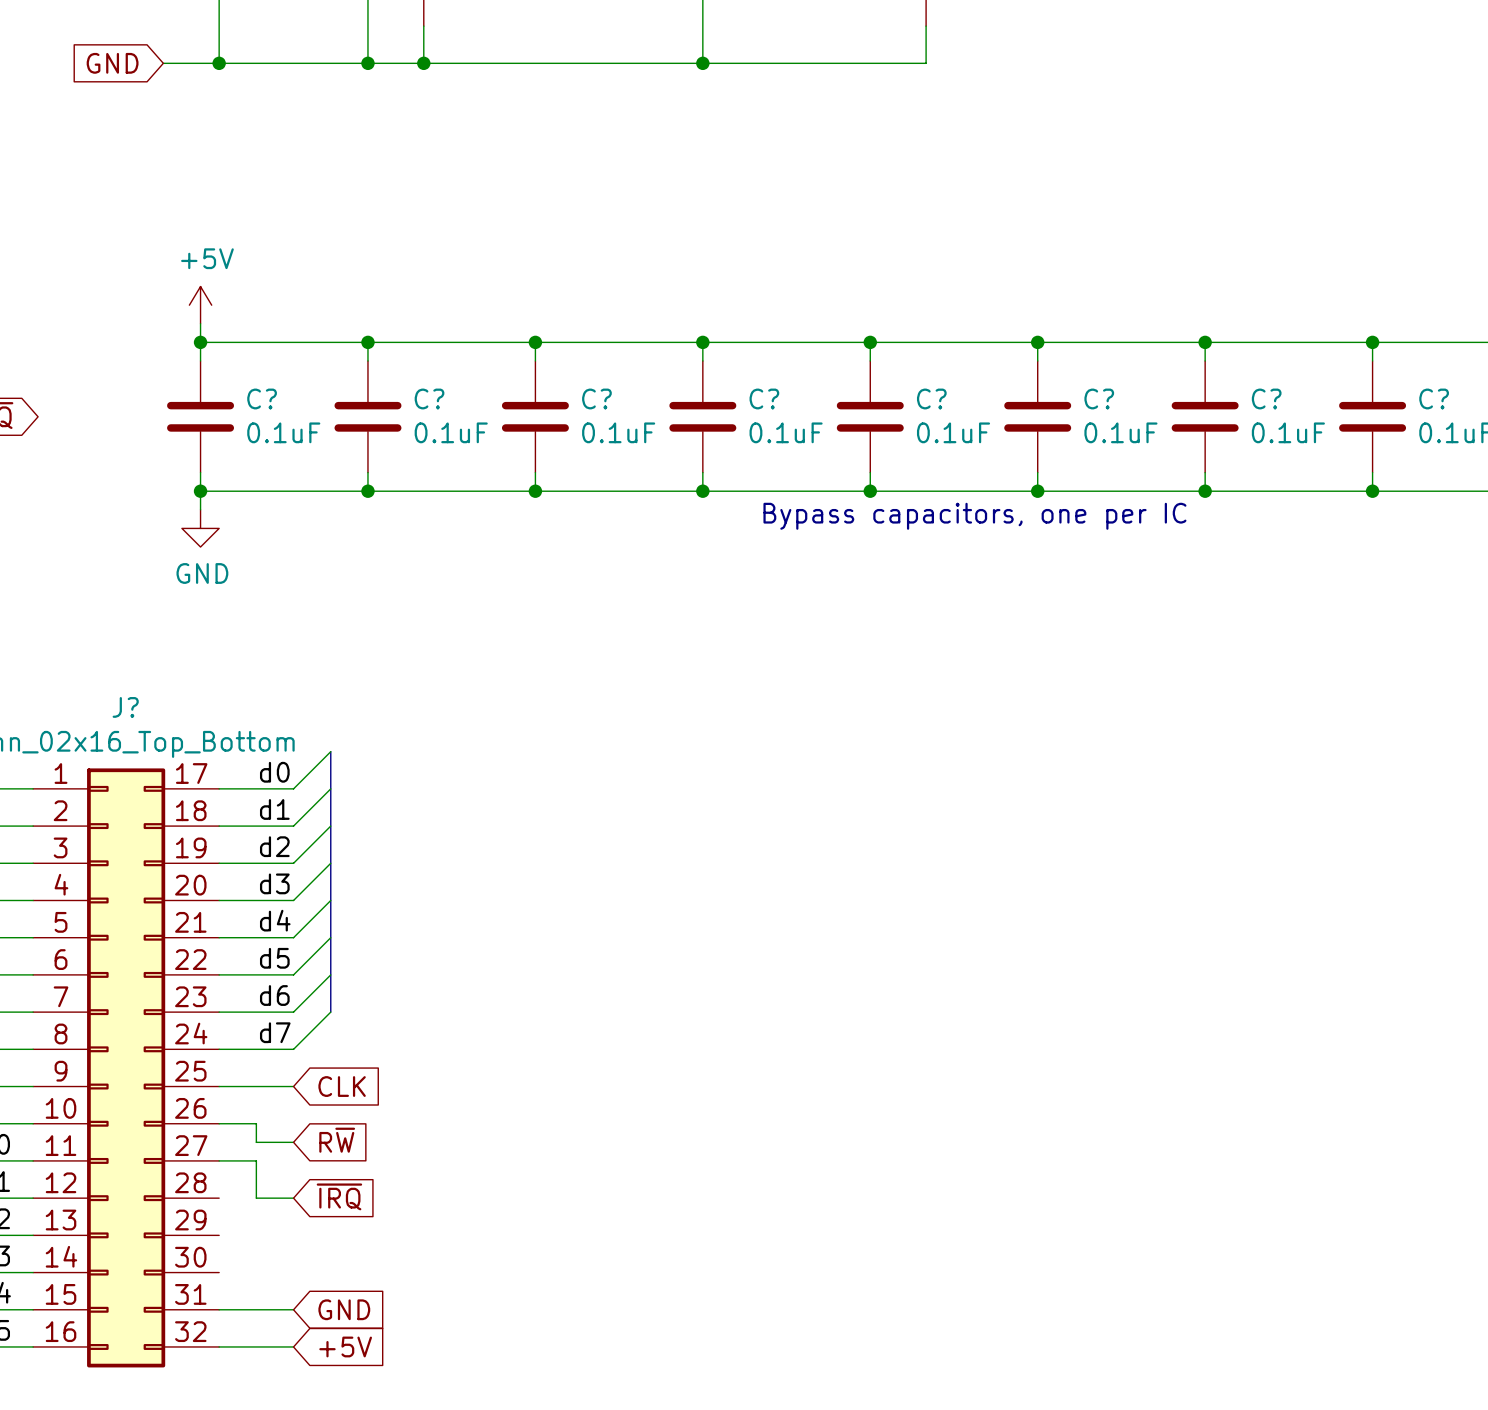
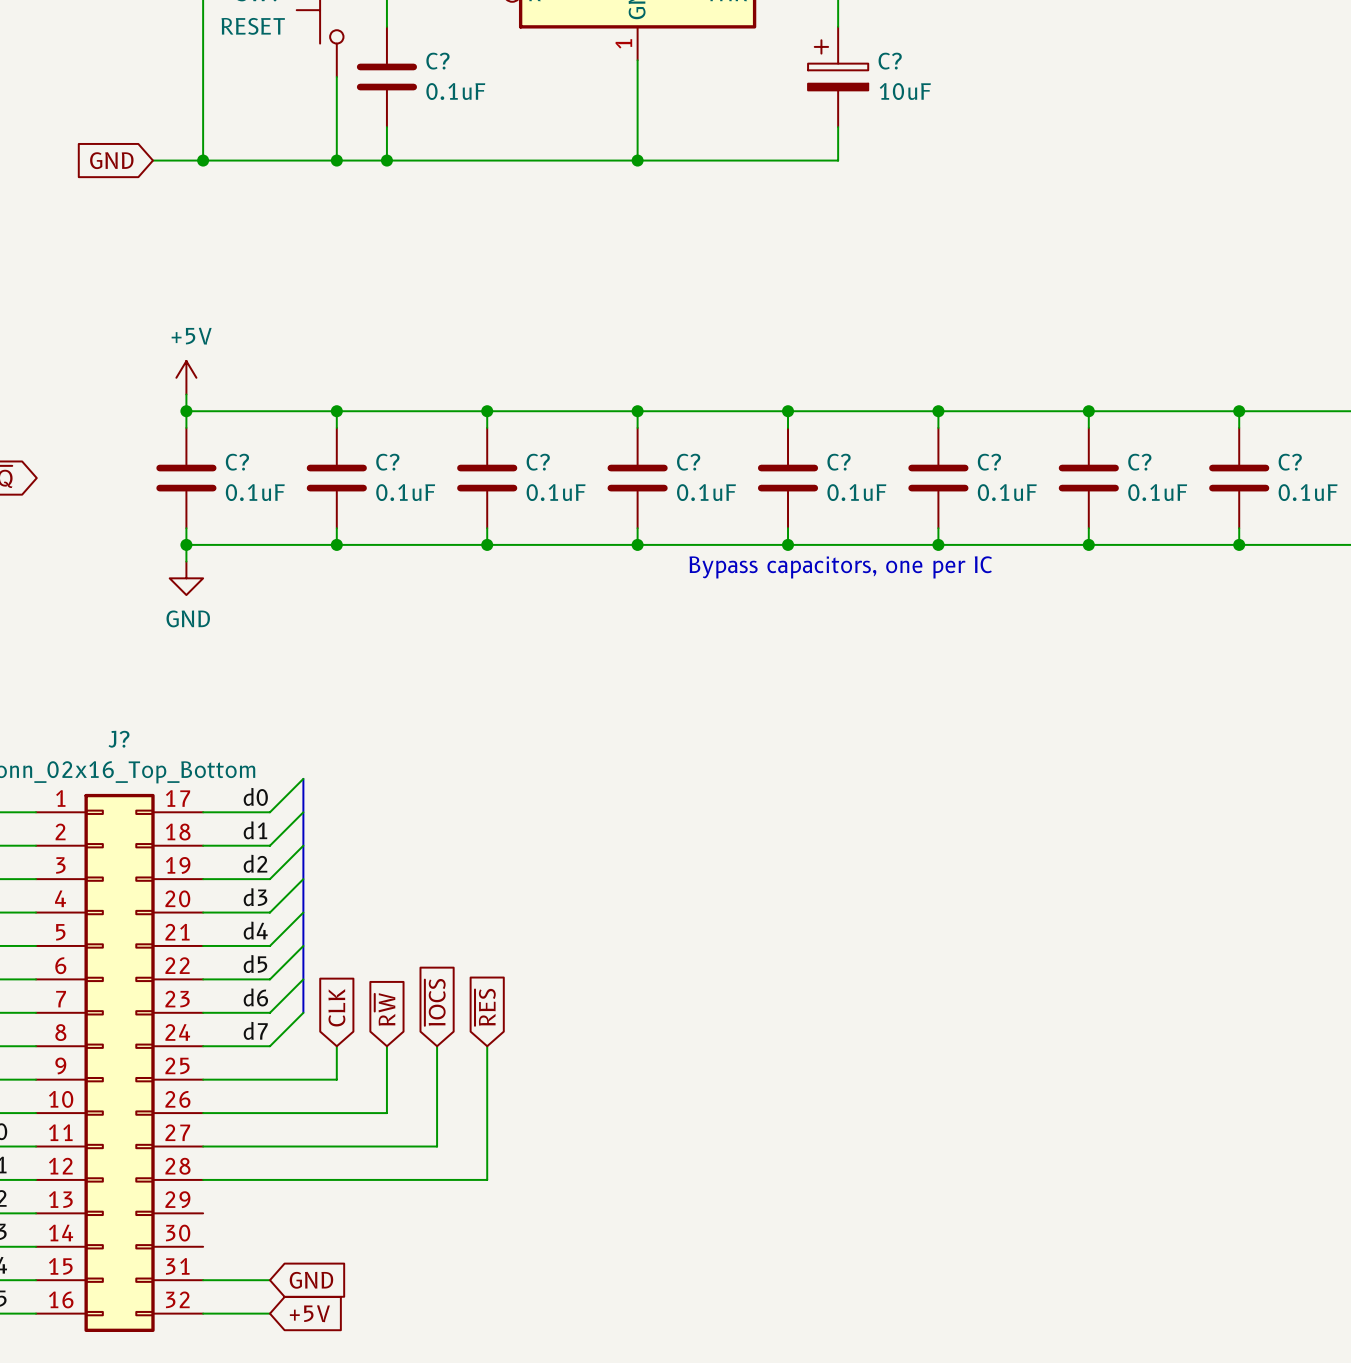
global label: none -> ~{IOCS} (435, 1002)
global label: none -> ~{RES} (485, 1007)
wire: none -> (336, 1046) (336, 1079) (269, 1079)
wire: none -> (437, 1046) (437, 1146) (236, 1146)
wire: none -> (487, 1046) (487, 1179) (269, 1179)
global label rotation: 0° (342, 1086) -> 90° counterclockwise (336, 1007)
wire: (256, 1123) (256, 1142) (293, 1142) -> (236, 1113) (386, 1113) (386, 1046)
global label rotation: 0° (337, 1140) -> 90° counterclockwise (385, 1009)
global label position: R~{W} (337, 1140) -> R~{W} (385, 1009)
wire: (256, 1160) (256, 1198) -> (203, 1179) (236, 1179)
global label: ~{IRQ} (339, 1196) -> none

